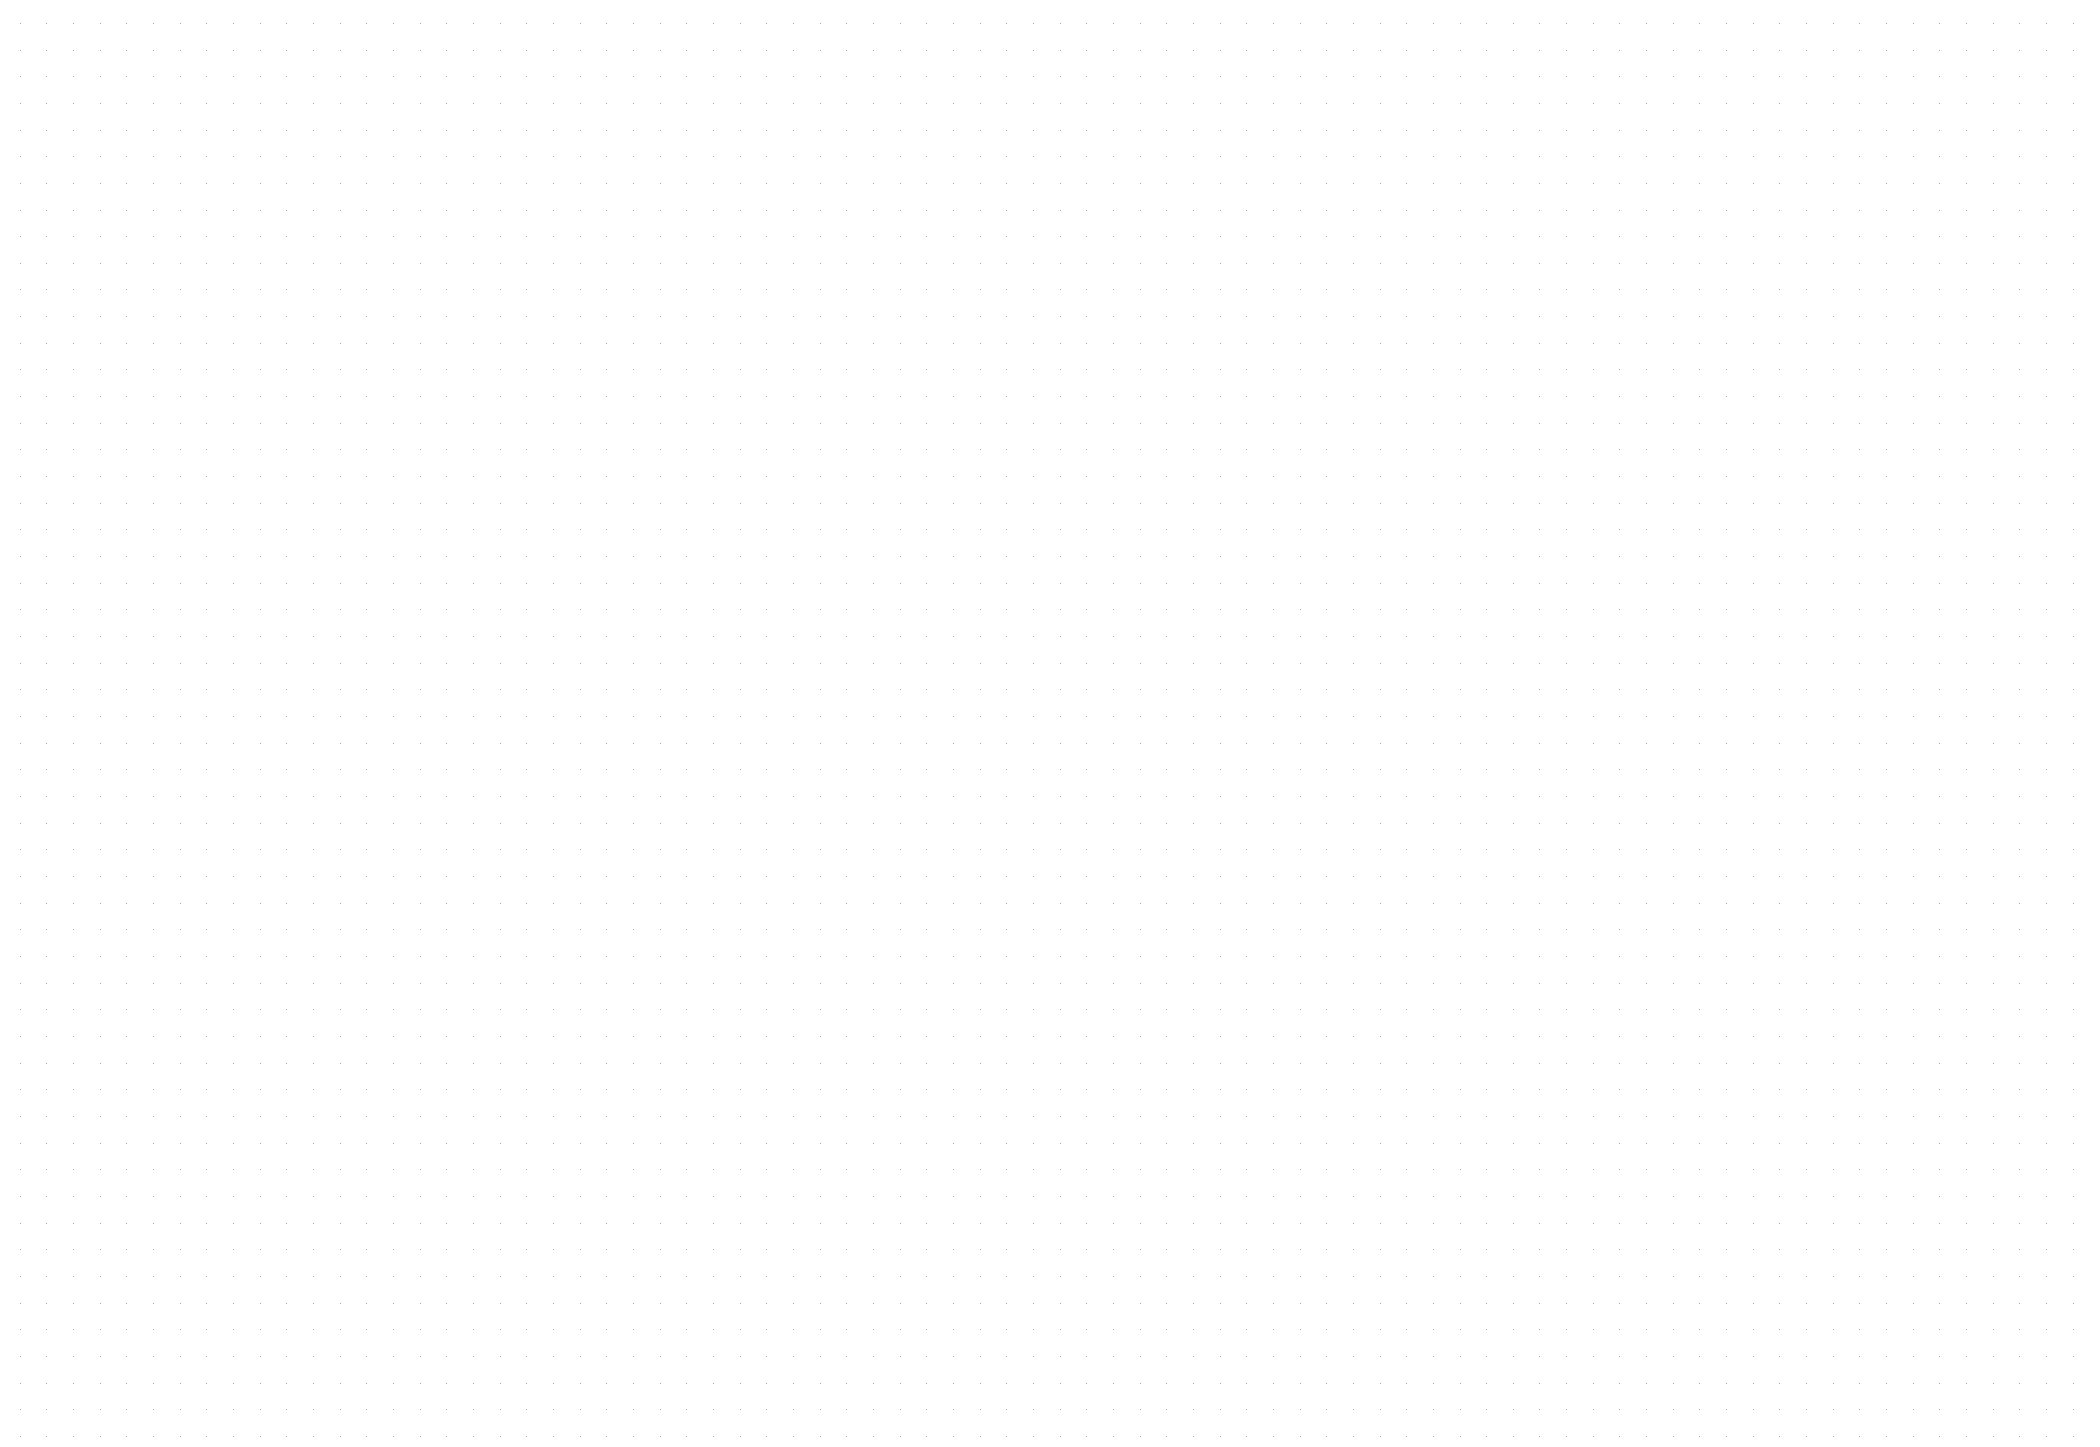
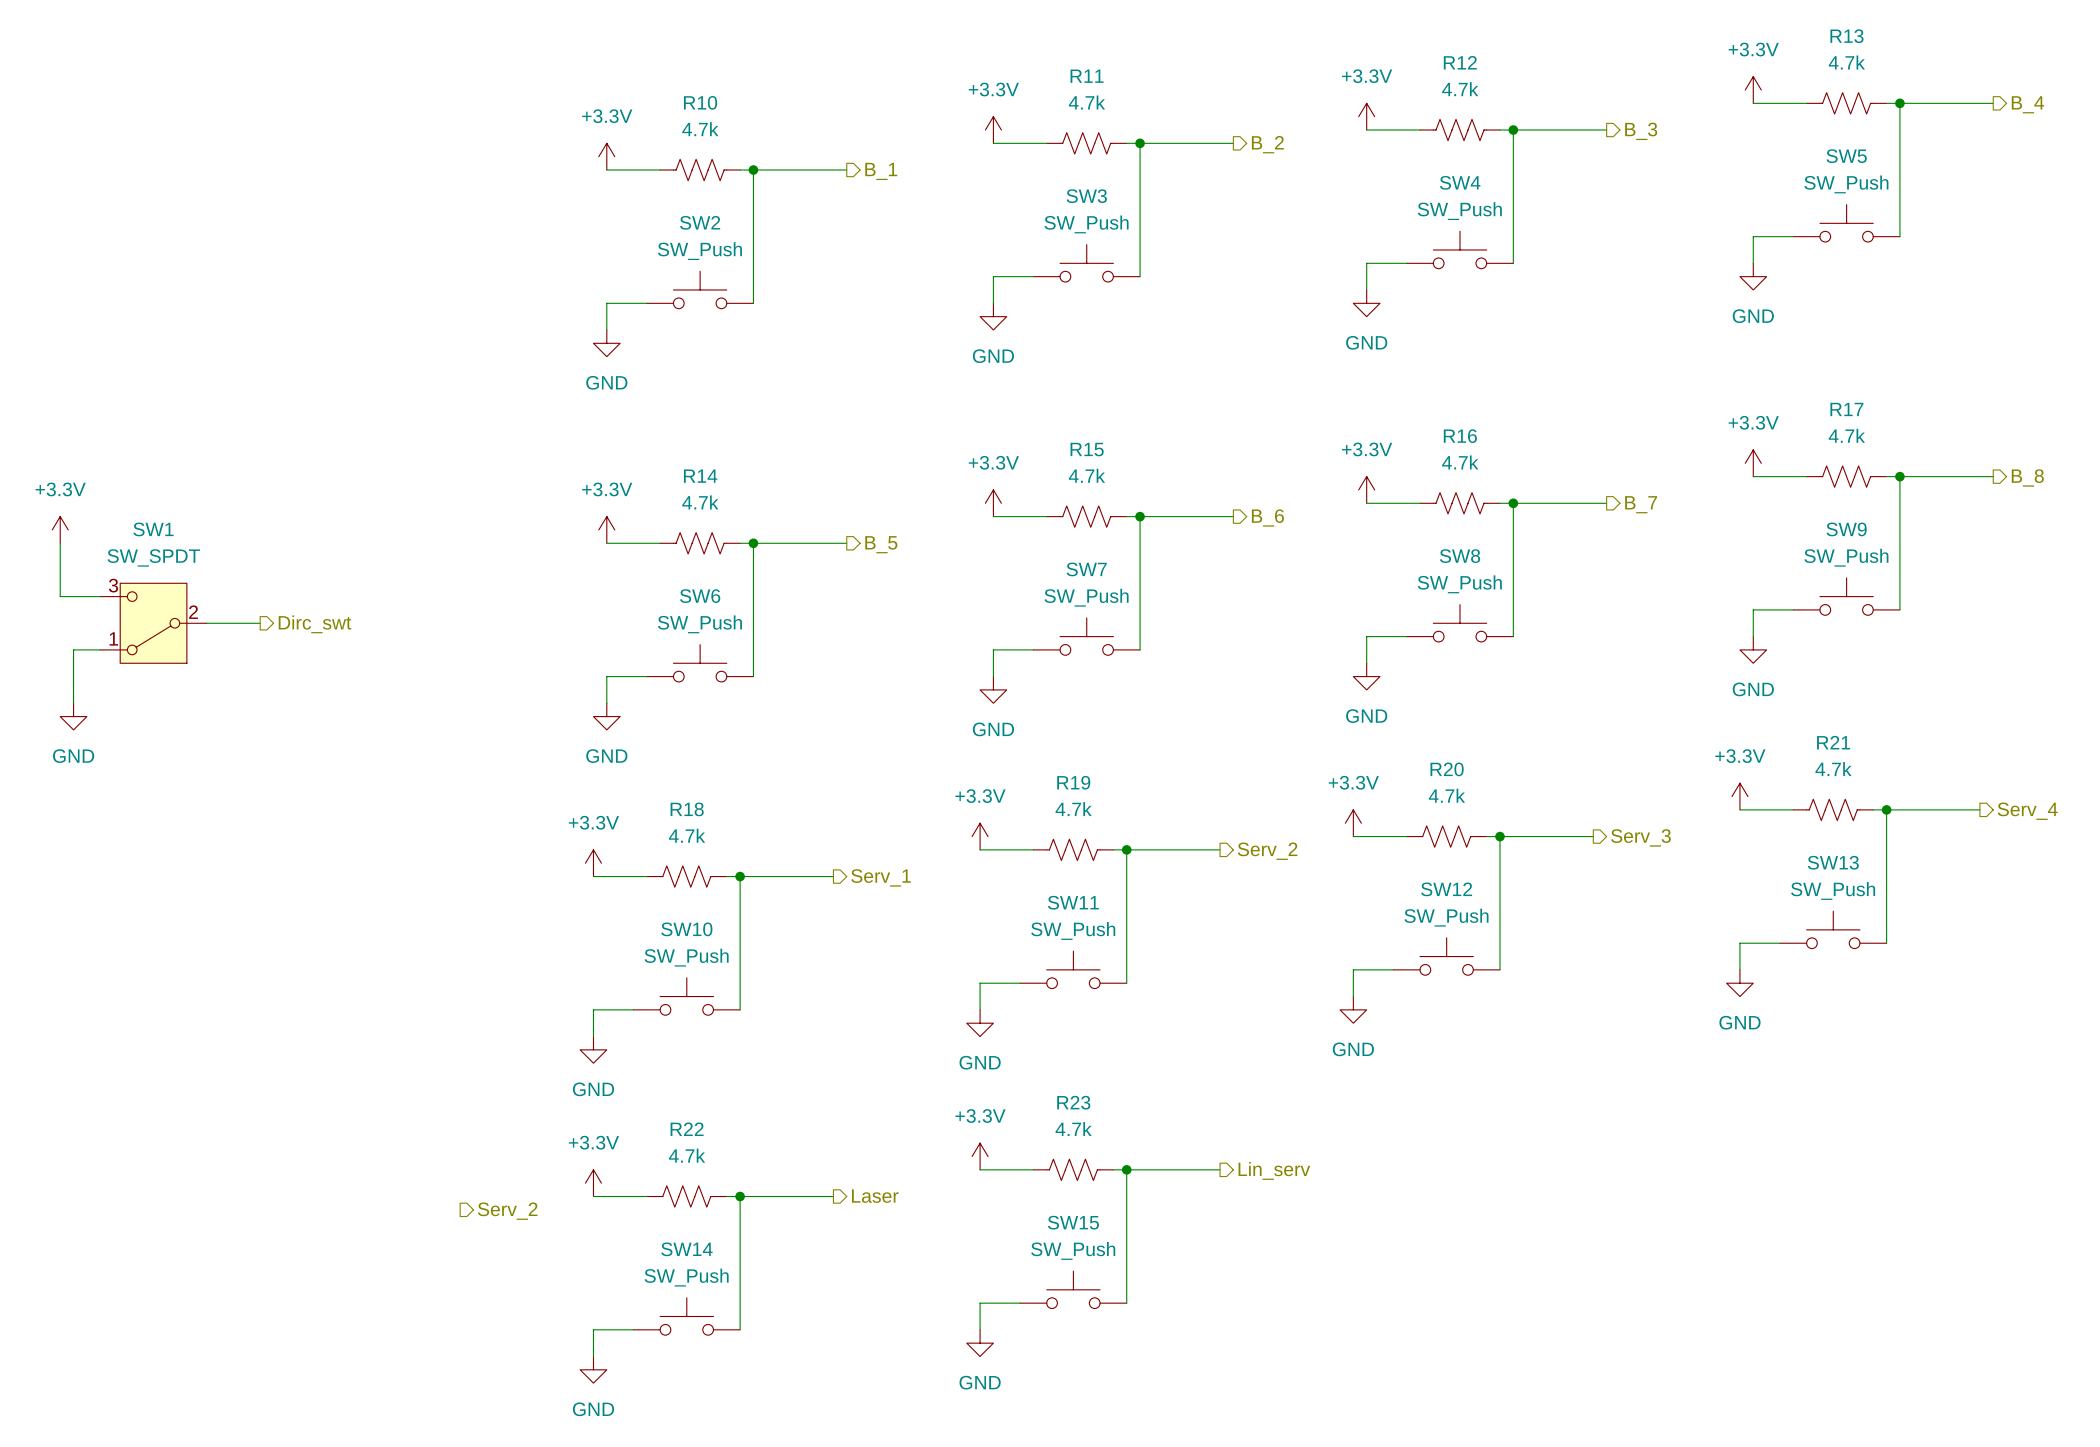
power symbol: none -> +3.3V (1753, 90)
wire: none -> (1753, 103) (1806, 103)
R13: none -> 4.7k (1846, 103)
wire: none -> (1886, 103) (1993, 103)
wire: none -> (1899, 103) (1899, 236)
junction: none -> (1899, 103)
hierarchical label: none -> B_4 (2027, 104)
power symbol: none -> +3.3V (1366, 116)
power symbol: none -> +3.3V (993, 130)
wire: none -> (1366, 130) (1420, 130)
R12: none -> 4.7k (1460, 130)
wire: none -> (1500, 130) (1606, 130)
wire: none -> (1513, 130) (1513, 263)
junction: none -> (1513, 130)
hierarchical label: none -> B_3 (1641, 131)
wire: none -> (993, 143) (1046, 143)
R11: none -> 4.7k (1086, 143)
wire: none -> (1126, 143) (1233, 143)
wire: none -> (1140, 143) (1140, 276)
junction: none -> (1140, 143)
hierarchical label: none -> B_2 (1267, 144)
power symbol: none -> +3.3V (606, 156)
wire: none -> (606, 170) (660, 170)
R10: none -> 4.7k (700, 170)
wire: none -> (740, 170) (846, 170)
wire: none -> (753, 170) (753, 303)
junction: none -> (753, 170)
hierarchical label: none -> B_1 (881, 171)
SW5: none -> SW_Push (1846, 223)
wire: none -> (1793, 236) (1753, 236) (1753, 263)
SW4: none -> SW_Push (1460, 249)
SW3: none -> SW_Push (1086, 263)
wire: none -> (1406, 263) (1366, 263) (1366, 289)
wire: none -> (1033, 276) (993, 276) (993, 303)
power symbol: none -> GND (1753, 276)
SW2: none -> SW_Push (700, 289)
wire: none -> (646, 303) (606, 303) (606, 329)
power symbol: none -> GND (1366, 303)
power symbol: none -> GND (993, 316)
power symbol: none -> GND (606, 343)
power symbol: none -> +3.3V (1753, 463)
wire: none -> (1753, 476) (1806, 476)
R17: none -> 4.7k (1846, 476)
wire: none -> (1886, 476) (1993, 476)
wire: none -> (1899, 476) (1899, 609)
junction: none -> (1899, 476)
hierarchical label: none -> B_8 (2027, 477)
power symbol: none -> +3.3V (1366, 489)
power symbol: none -> +3.3V (993, 503)
wire: none -> (1366, 503) (1420, 503)
R16: none -> 4.7k (1460, 503)
wire: none -> (1500, 503) (1606, 503)
wire: none -> (1513, 503) (1513, 636)
junction: none -> (1513, 503)
hierarchical label: none -> B_7 (1641, 504)
wire: none -> (993, 516) (1046, 516)
R15: none -> 4.7k (1086, 516)
wire: none -> (1126, 516) (1233, 516)
wire: none -> (1140, 516) (1140, 649)
junction: none -> (1140, 516)
hierarchical label: none -> B_6 (1267, 517)
power symbol: none -> +3.3V (60, 529)
power symbol: none -> +3.3V (606, 529)
wire: none -> (60, 543) (60, 596) (100, 596)
wire: none -> (606, 543) (660, 543)
R14: none -> 4.7k (700, 543)
wire: none -> (740, 543) (846, 543)
wire: none -> (753, 543) (753, 676)
junction: none -> (753, 543)
hierarchical label: none -> B_5 (881, 544)
SW9: none -> SW_Push (1846, 596)
wire: none -> (1793, 609) (1753, 609) (1753, 636)
SW1: none -> SW_SPDT (153, 623)
wire: none -> (206, 623) (260, 623)
SW8: none -> SW_Push (1460, 623)
hierarchical label: none -> Dirc_swt (314, 624)
SW7: none -> SW_Push (1086, 636)
wire: none -> (1406, 636) (1366, 636) (1366, 663)
wire: none -> (100, 649) (73, 649) (73, 703)
wire: none -> (1033, 649) (993, 649) (993, 676)
power symbol: none -> GND (1753, 649)
SW6: none -> SW_Push (700, 663)
wire: none -> (646, 676) (606, 676) (606, 703)
power symbol: none -> GND (1366, 676)
power symbol: none -> GND (993, 689)
power symbol: none -> GND (73, 716)
power symbol: none -> GND (606, 716)
power symbol: none -> +3.3V (1739, 796)
wire: none -> (1739, 809) (1793, 809)
R21: none -> 4.7k (1833, 809)
wire: none -> (1873, 809) (1979, 809)
wire: none -> (1886, 809) (1886, 943)
junction: none -> (1886, 809)
hierarchical label: none -> Serv_4 (2027, 811)
power symbol: none -> +3.3V (1353, 823)
power symbol: none -> +3.3V (980, 836)
wire: none -> (1353, 836) (1406, 836)
R20: none -> 4.7k (1446, 836)
wire: none -> (1486, 836) (1593, 836)
wire: none -> (1500, 836) (1500, 969)
junction: none -> (1500, 836)
hierarchical label: none -> Serv_3 (1640, 837)
wire: none -> (980, 849) (1033, 849)
R19: none -> 4.7k (1073, 849)
wire: none -> (1113, 849) (1220, 849)
wire: none -> (1126, 849) (1126, 983)
junction: none -> (1126, 849)
hierarchical label: none -> Serv_2 (1267, 851)
power symbol: none -> +3.3V (593, 863)
wire: none -> (593, 876) (646, 876)
R18: none -> 4.7k (686, 876)
wire: none -> (726, 876) (833, 876)
wire: none -> (740, 876) (740, 1009)
junction: none -> (740, 876)
hierarchical label: none -> Serv_1 (881, 877)
SW13: none -> SW_Push (1833, 929)
wire: none -> (1779, 943) (1739, 943) (1739, 969)
SW12: none -> SW_Push (1446, 956)
SW11: none -> SW_Push (1073, 969)
wire: none -> (1393, 969) (1353, 969) (1353, 996)
wire: none -> (1020, 983) (980, 983) (980, 1009)
power symbol: none -> GND (1739, 983)
SW10: none -> SW_Push (686, 996)
wire: none -> (633, 1009) (593, 1009) (593, 1036)
power symbol: none -> GND (1353, 1009)
power symbol: none -> GND (980, 1023)
power symbol: none -> GND (593, 1049)
power symbol: none -> +3.3V (980, 1156)
wire: none -> (980, 1169) (1033, 1169)
R23: none -> 4.7k (1073, 1169)
wire: none -> (1113, 1169) (1220, 1169)
wire: none -> (1126, 1169) (1126, 1303)
junction: none -> (1126, 1169)
hierarchical label: none -> Lin_serv (1274, 1170)
power symbol: none -> +3.3V (593, 1183)
wire: none -> (593, 1196) (646, 1196)
R22: none -> 4.7k (686, 1196)
wire: none -> (726, 1196) (833, 1196)
wire: none -> (740, 1196) (740, 1329)
junction: none -> (740, 1196)
hierarchical label: none -> Laser (875, 1196)
hierarchical label: none -> Serv_2 (507, 1211)
SW15: none -> SW_Push (1073, 1289)
wire: none -> (1020, 1303) (980, 1303) (980, 1329)
SW14: none -> SW_Push (686, 1316)
wire: none -> (633, 1329) (593, 1329) (593, 1356)
power symbol: none -> GND (980, 1343)
power symbol: none -> GND (593, 1369)

